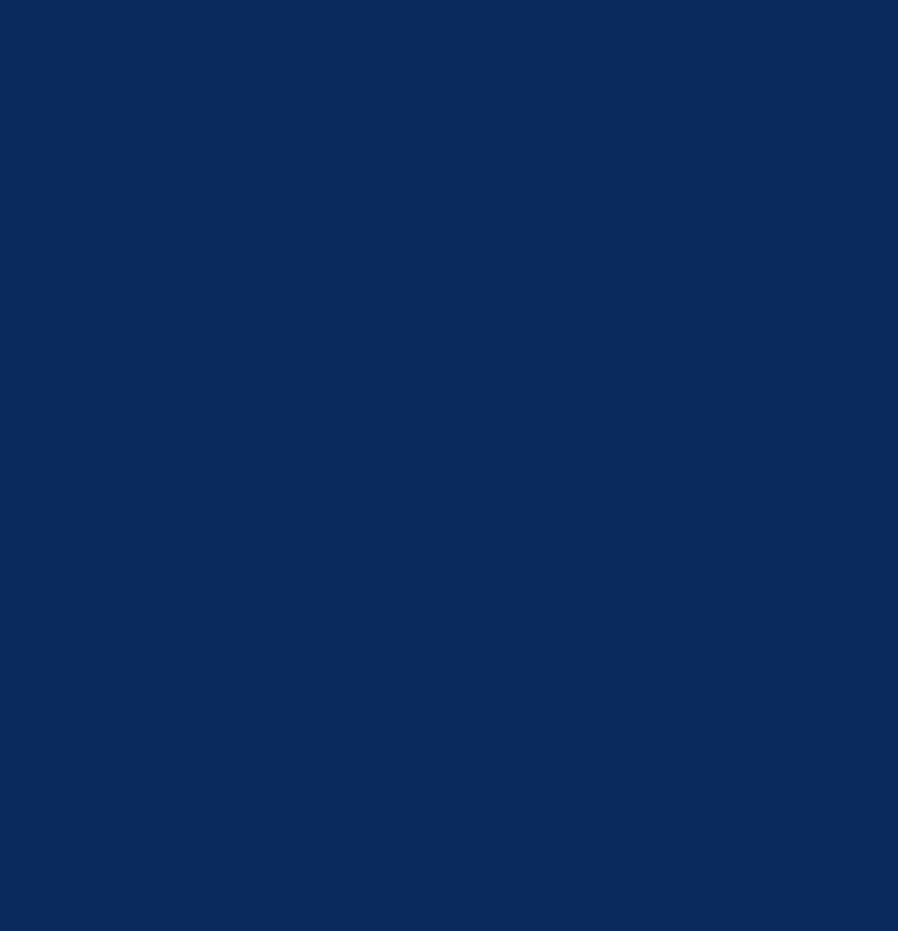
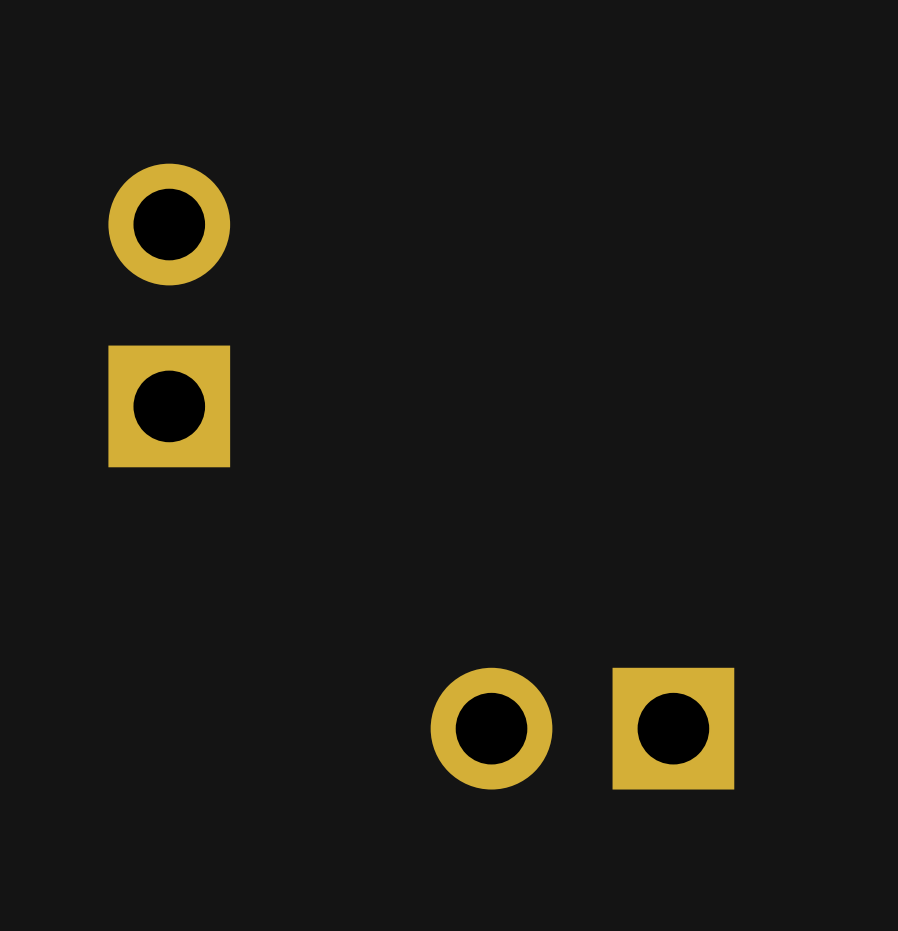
part: none -> (169, 315)
part: none -> (582, 728)

